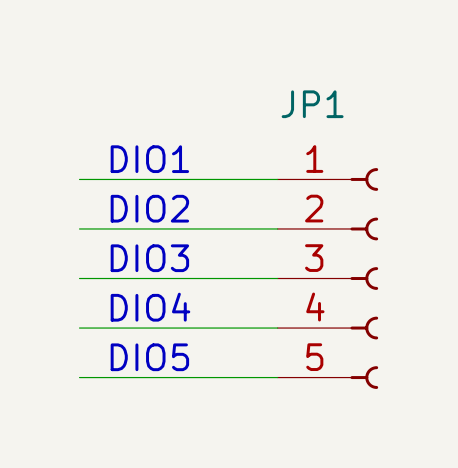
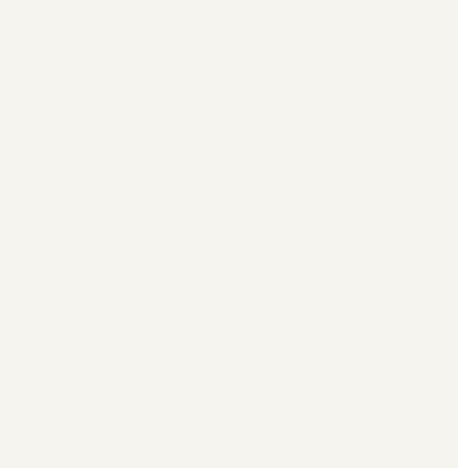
text: DIO1 (149, 159) -> none
wire: (79, 179) (277, 179) -> none
text: DIO2 (149, 208) -> none
wire: (79, 228) (277, 228) -> none
text: DIO3 (149, 258) -> none
wire: (79, 278) (277, 278) -> none
JP1: (327, 278) -> none
text: DIO4 (150, 307) -> none
wire: (79, 328) (277, 328) -> none
text: DIO5 (149, 357) -> none
wire: (79, 377) (277, 377) -> none

